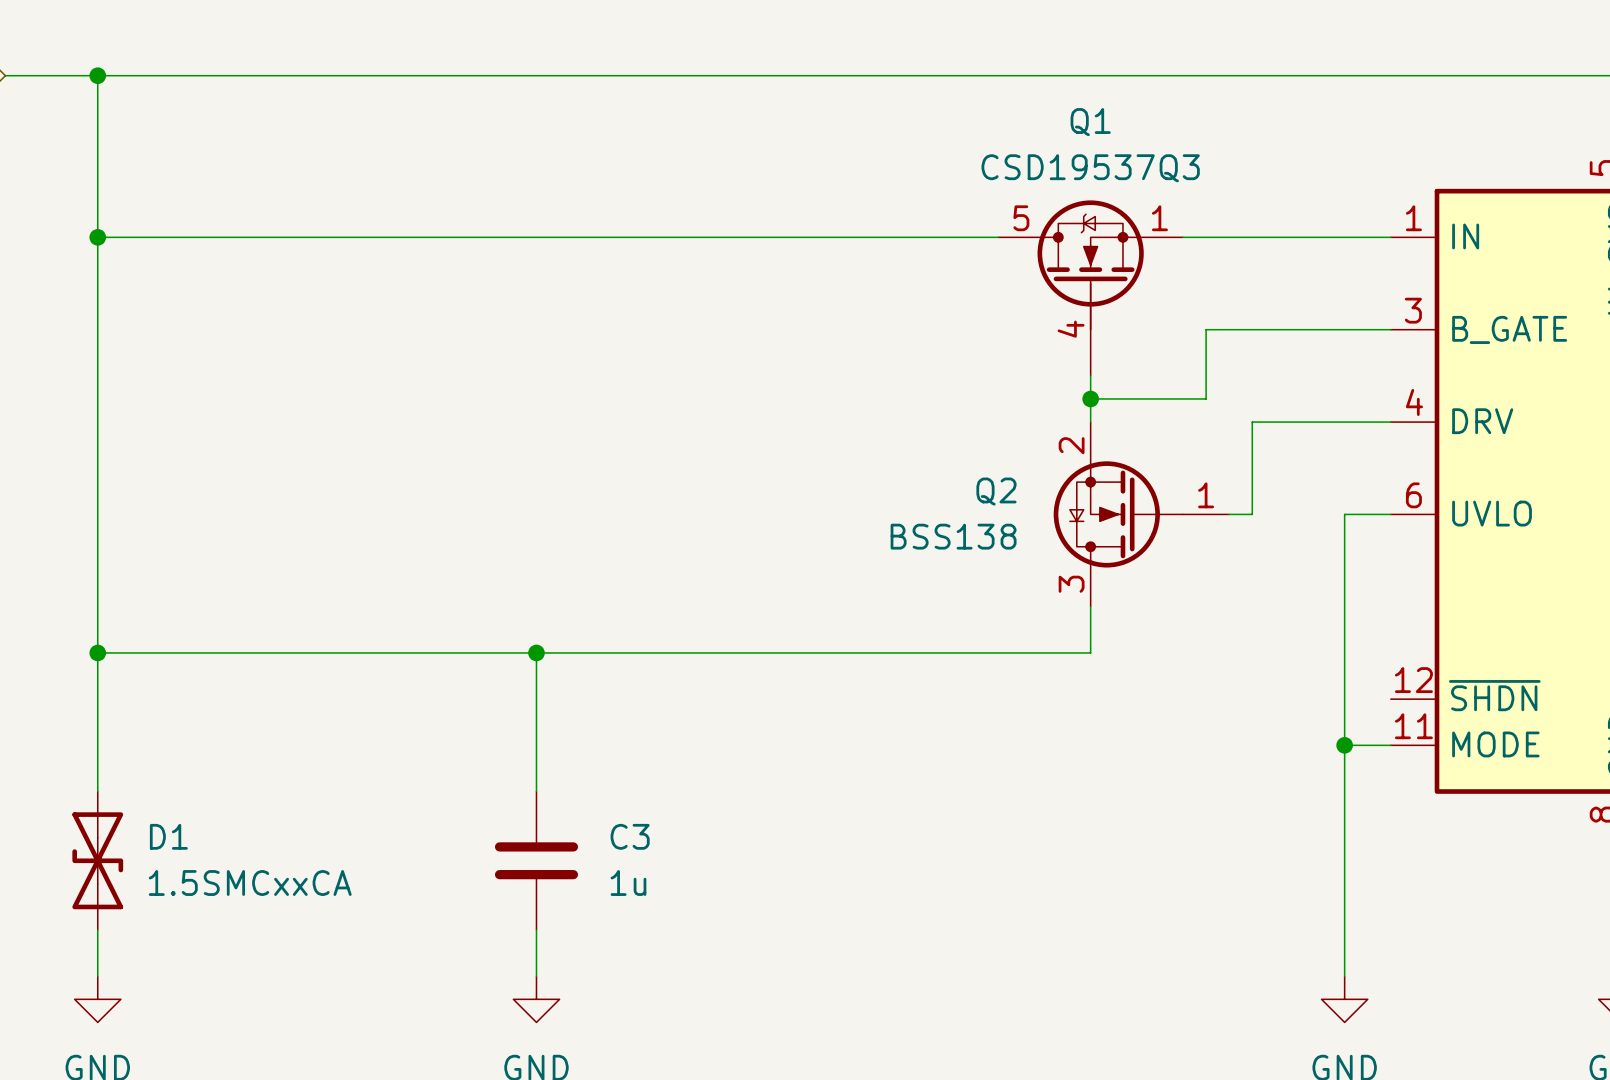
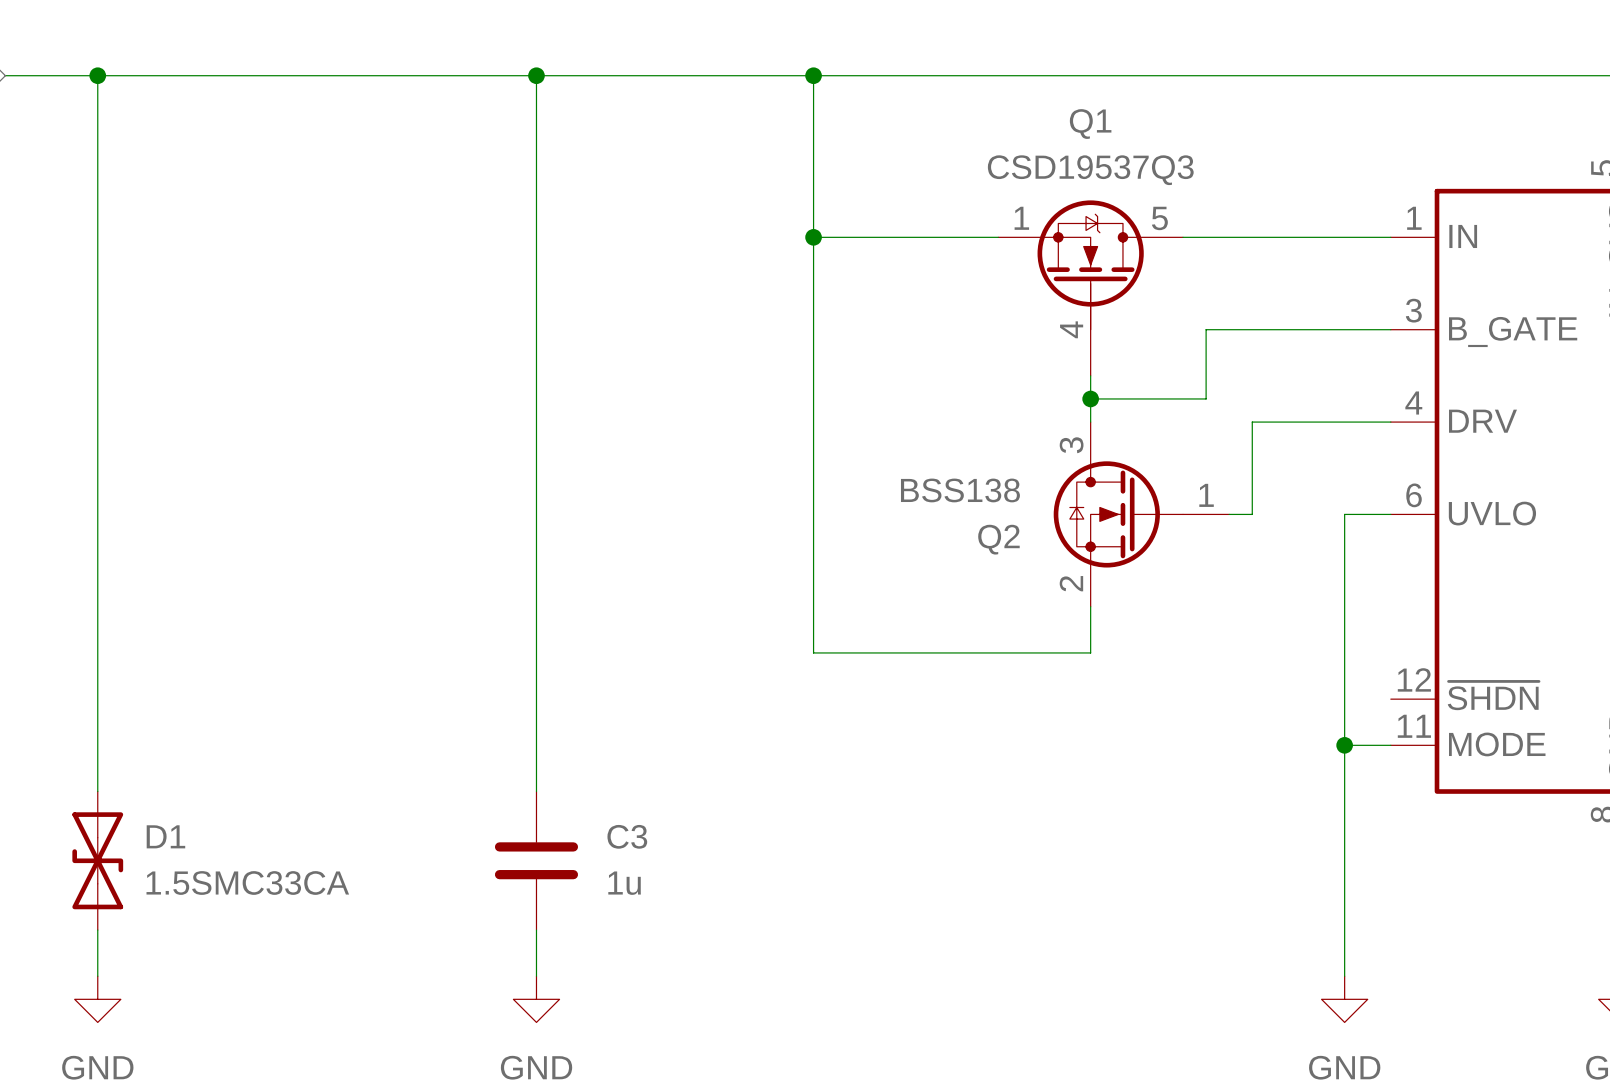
wire: none -> (536, 75) (536, 652)
junction: none -> (536, 75)
junction: none -> (813, 75)
wire: (97, 237) (813, 237) -> none
junction: (97, 237) -> none
junction: none -> (813, 237)
Q1 flip: as is (1090, 265) -> left-right (1090, 265)
Q2 flip: as is (1118, 514) -> up-down (1118, 514)
wire: (97, 652) (813, 652) -> (813, 75) (813, 652)
junction: (97, 652) -> none
junction: (536, 652) -> none
D1 value: 1.5SMCxxCA (250, 883) -> 1.5SMC33CA (247, 883)

